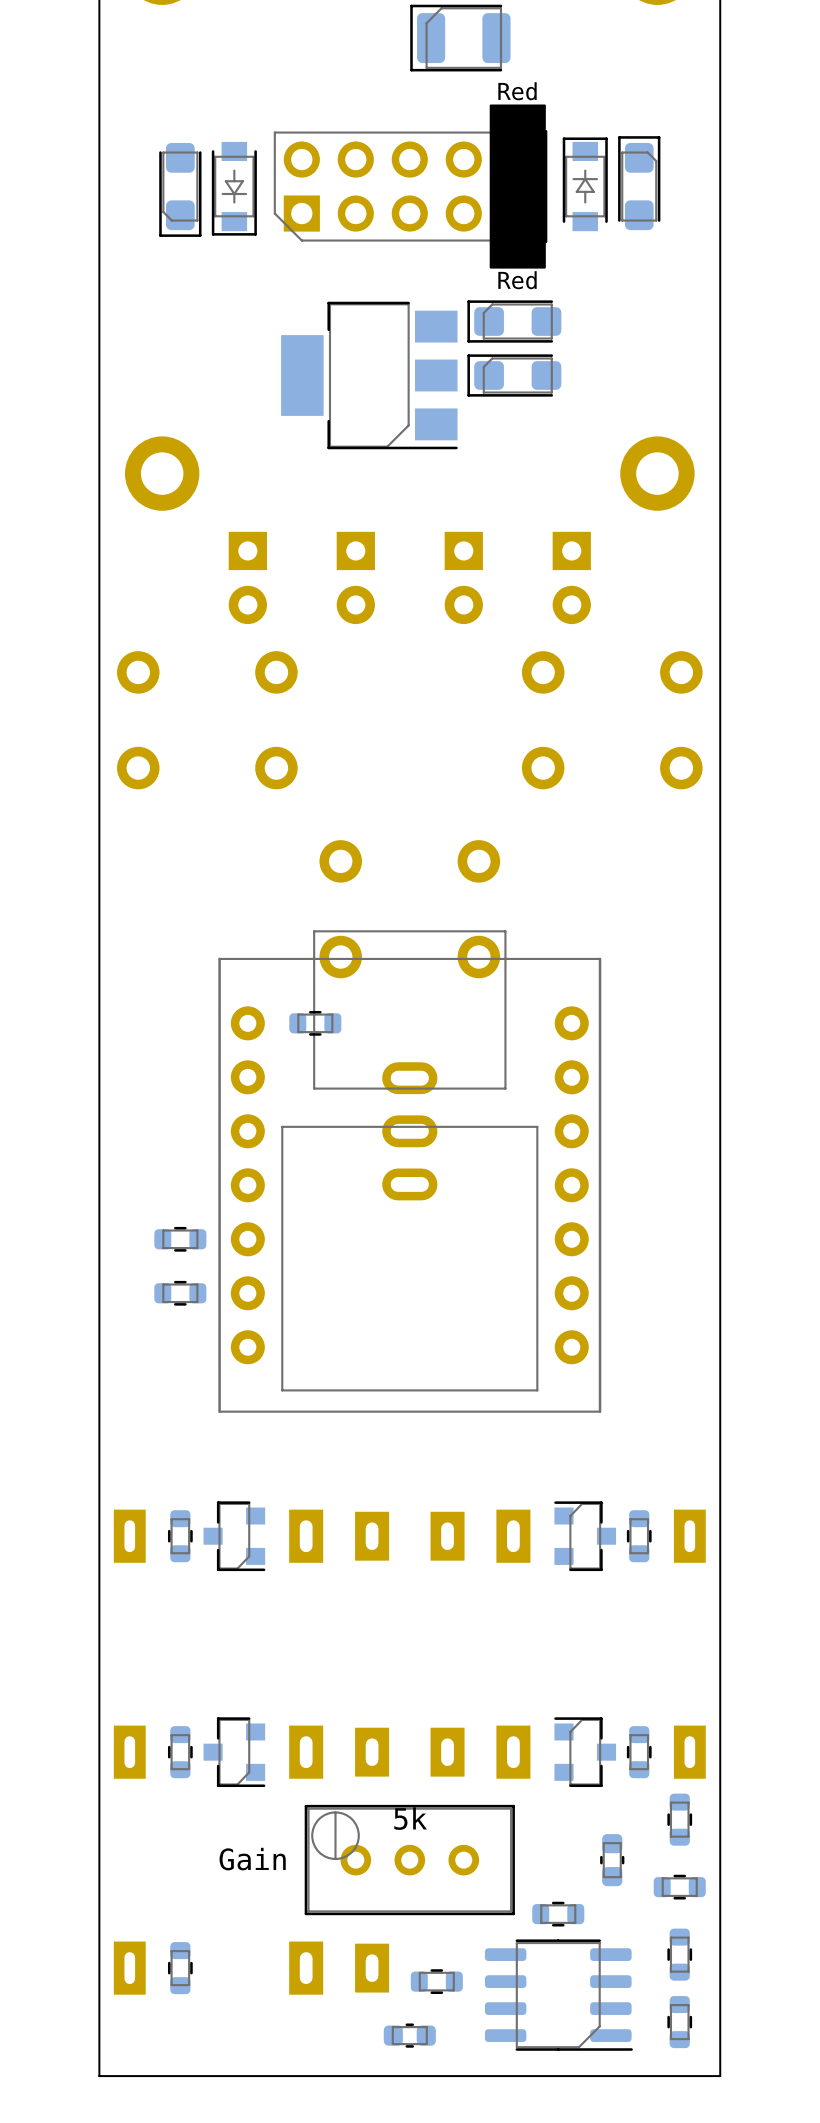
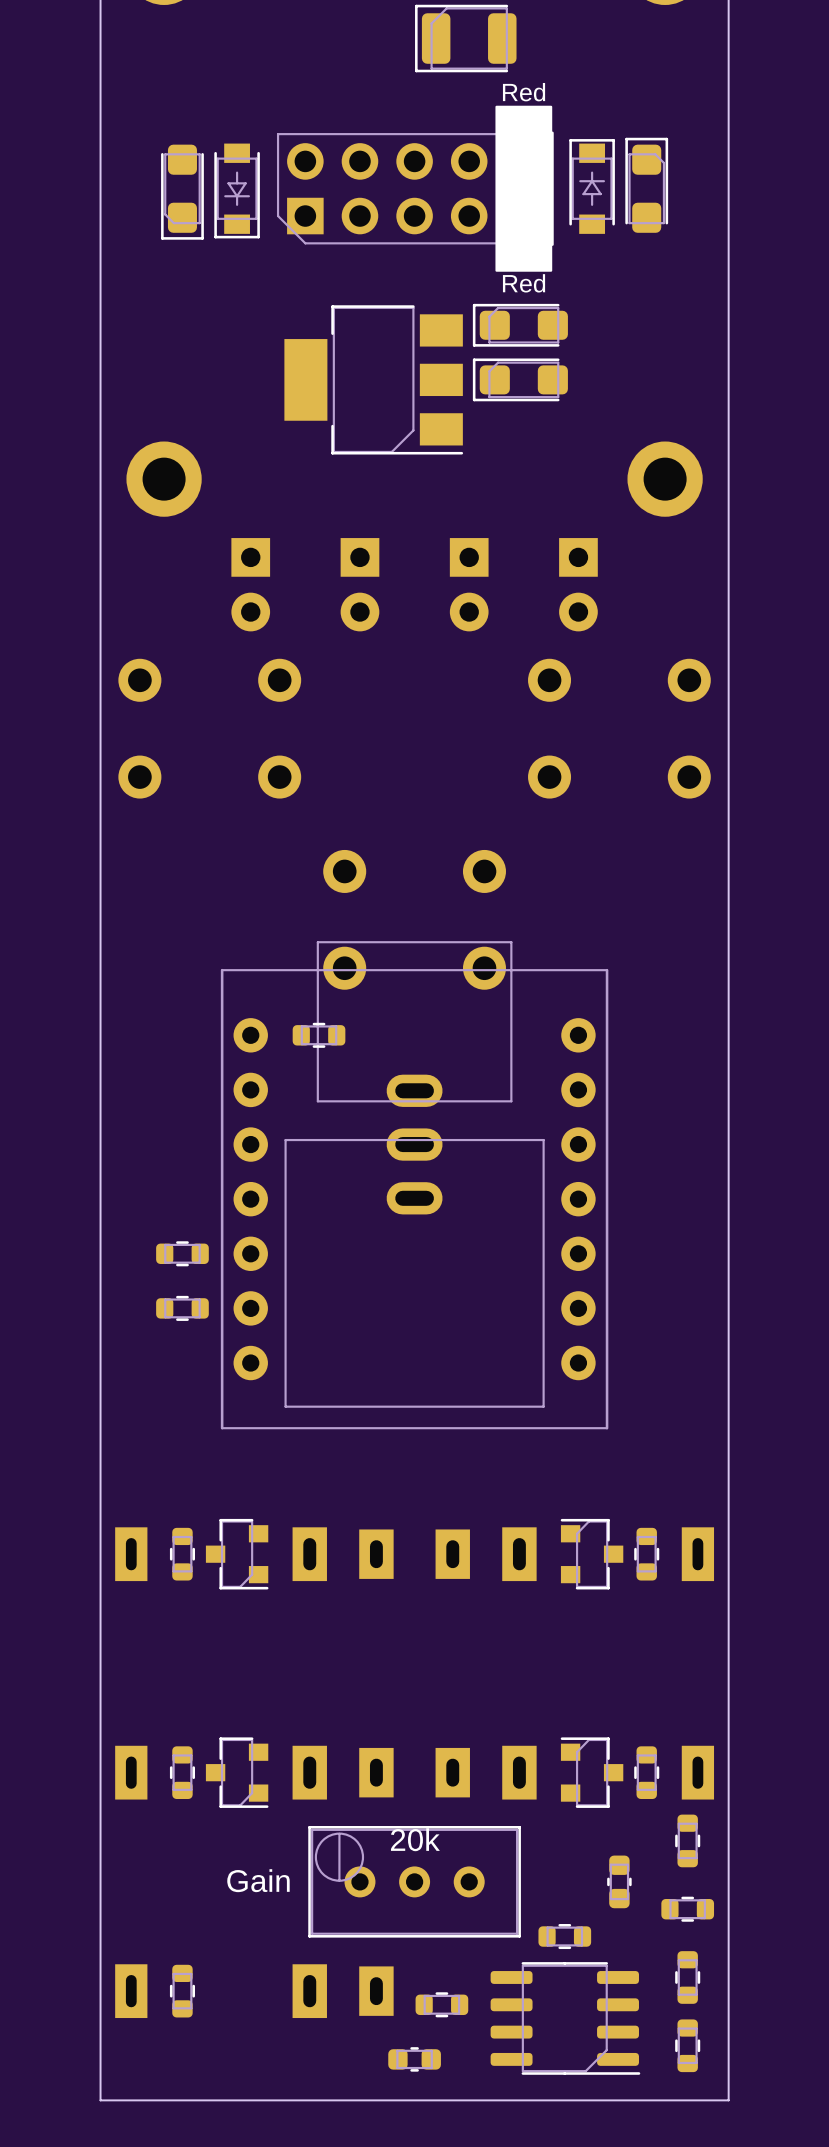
part value: 5k (410, 1818) -> 20k (415, 1839)

